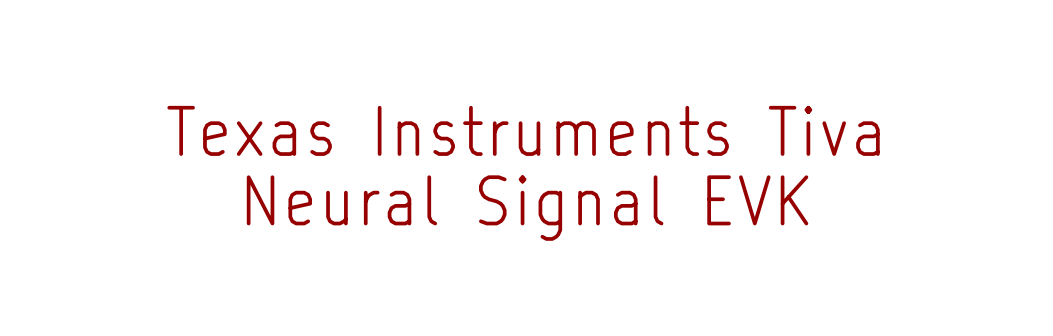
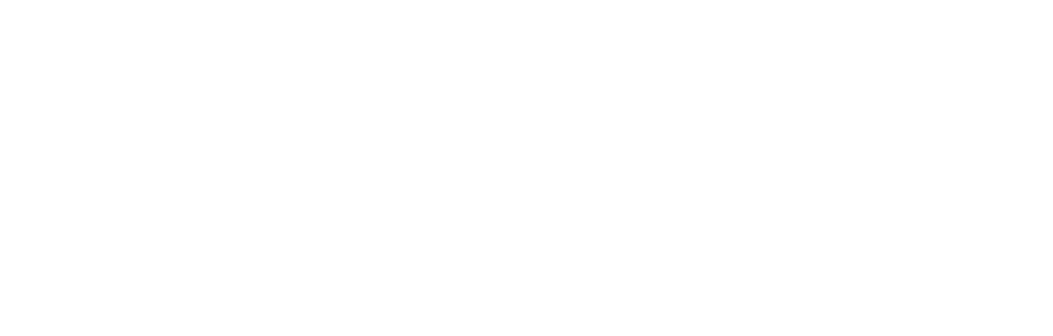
text: Texas Instruments Tiva (523, 130) -> none
text: Neural Signal EVK (527, 208) -> none

